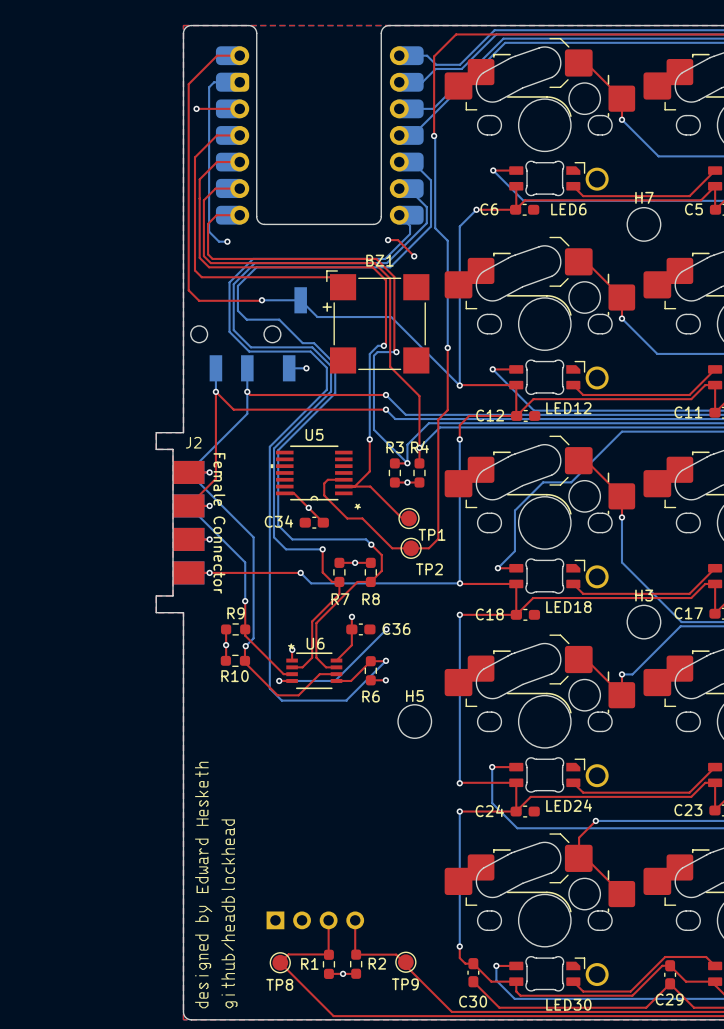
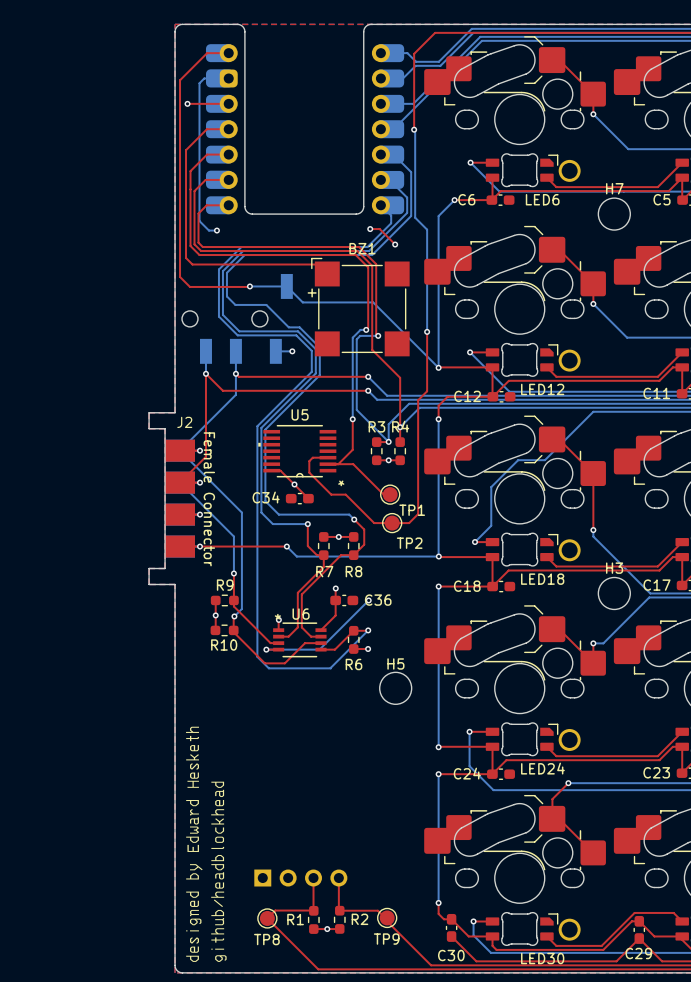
top track: none -> (593, 493) (593, 530)
bottom track: (621, 517) (621, 555) -> none
via position: (621, 517) -> (593, 530)

